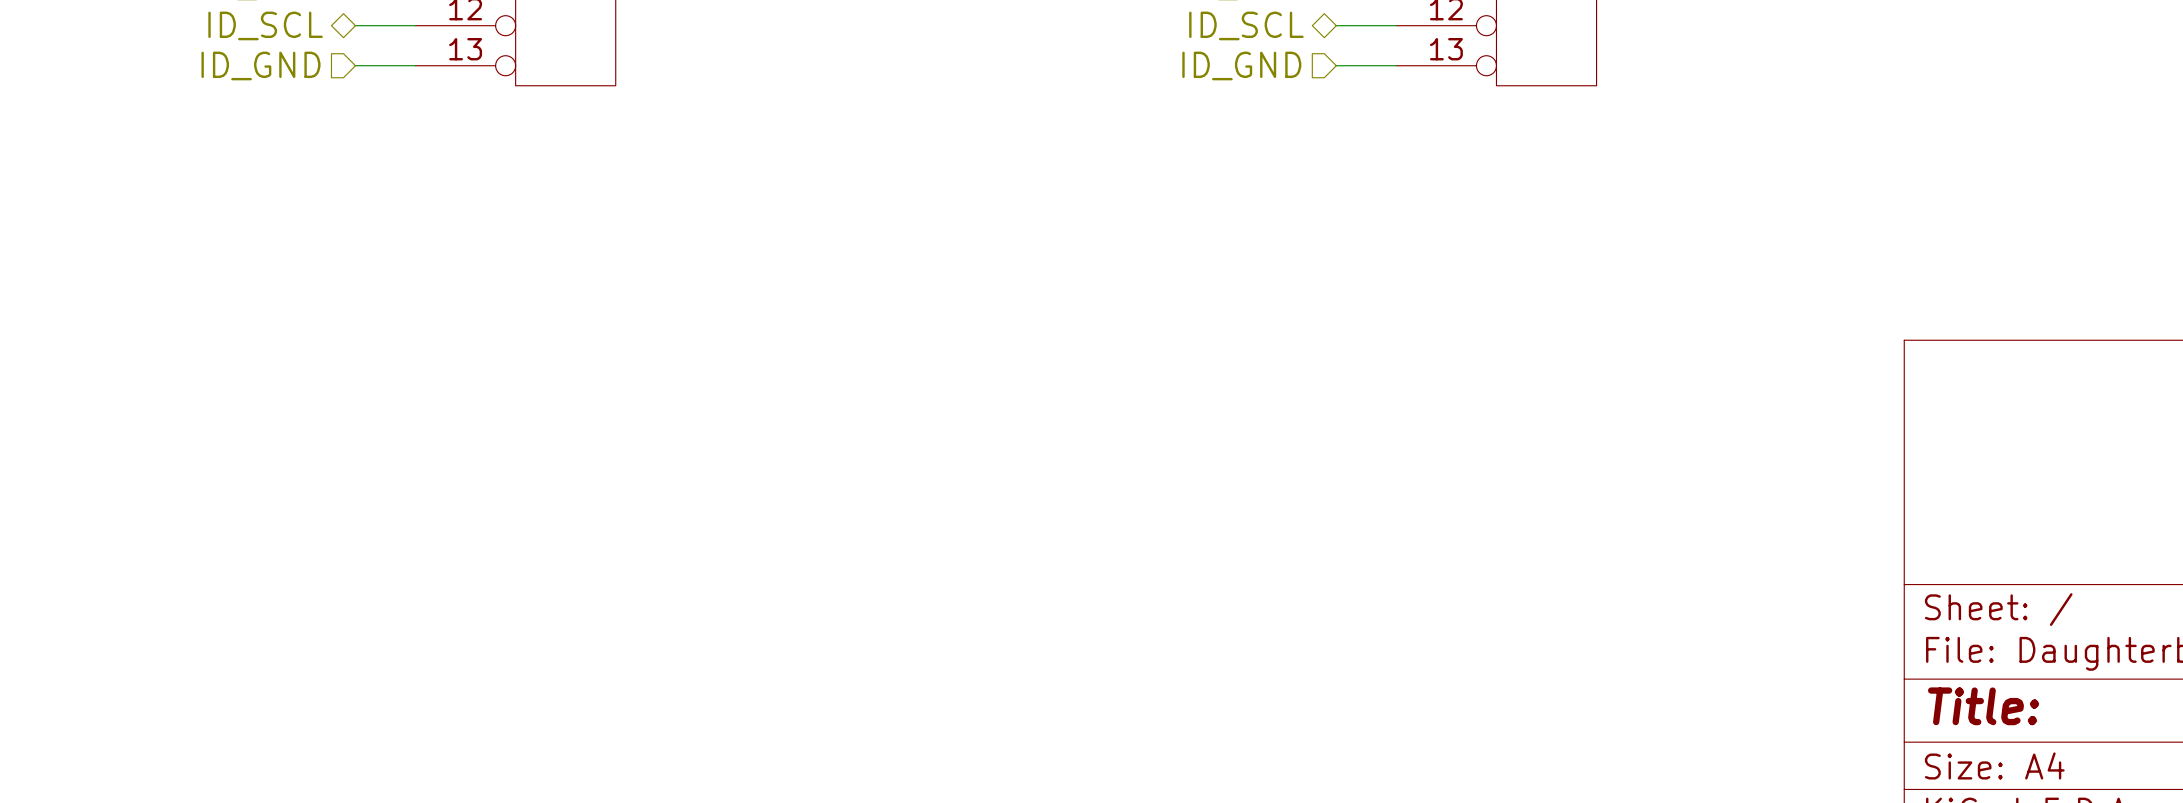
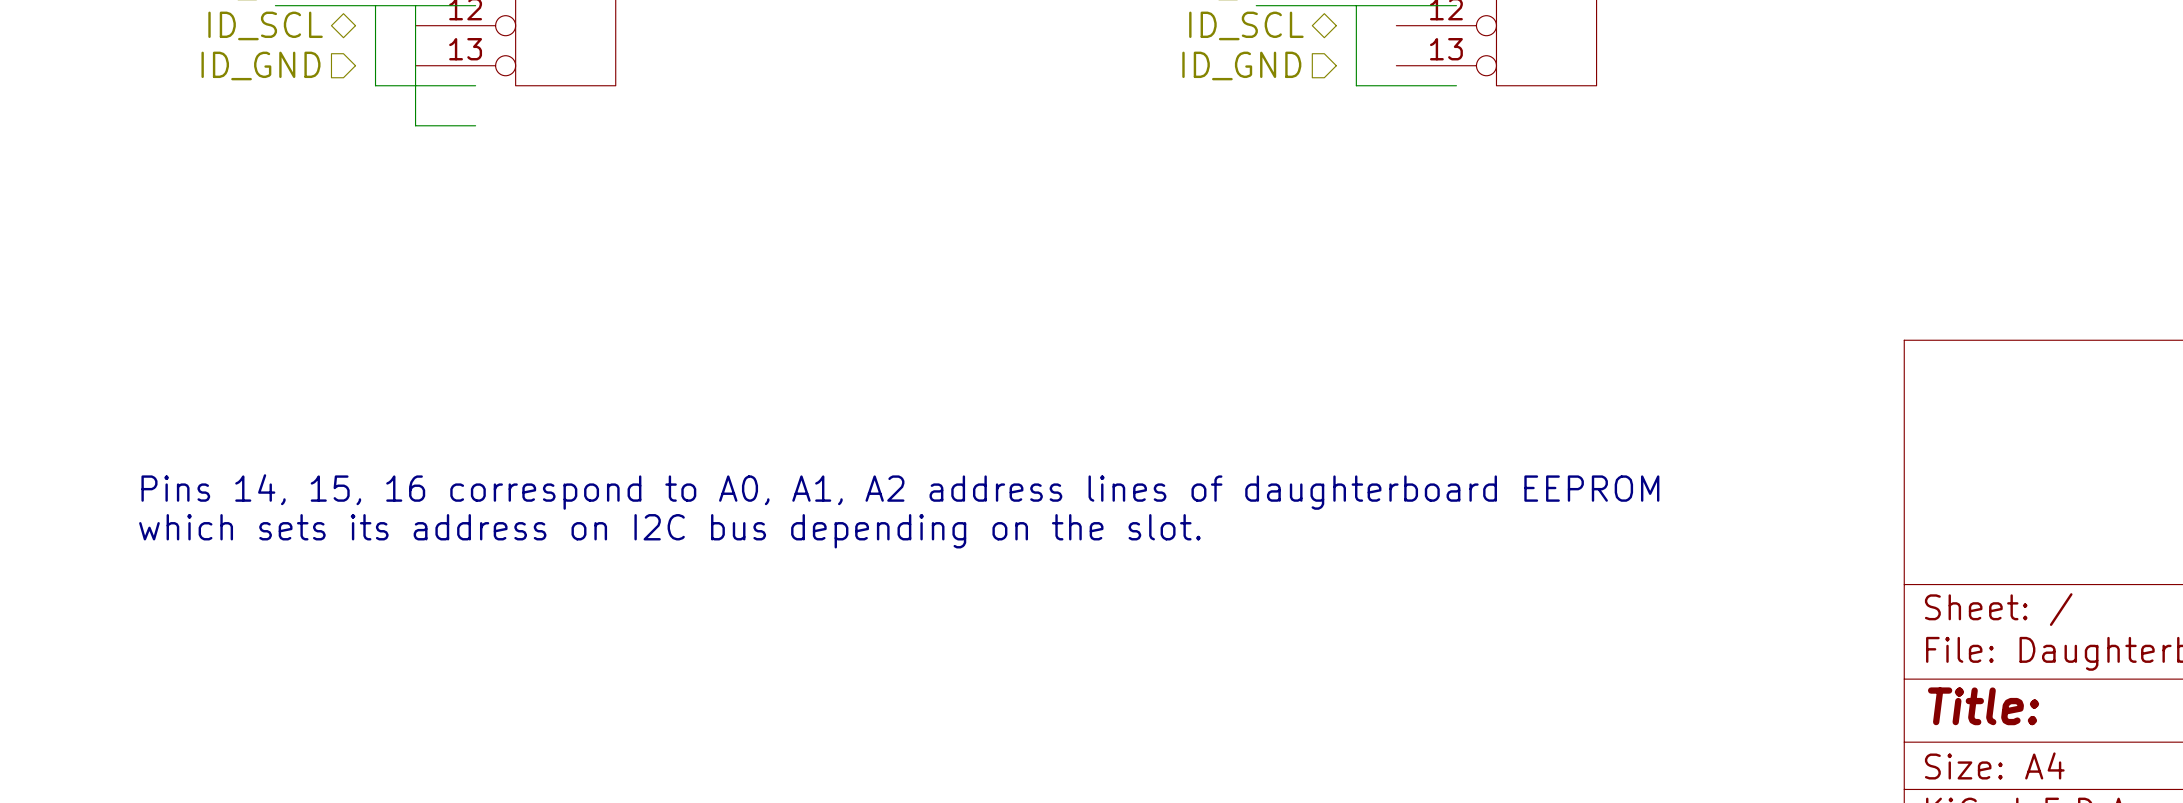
wire: none -> (275, 5) (475, 5)
wire: none -> (375, 5) (375, 85) (475, 85)
wire: none -> (415, 5) (415, 125) (475, 125)
wire: none -> (1256, 5) (1456, 5)
wire: none -> (1356, 5) (1356, 85) (1456, 85)
wire: (355, 25) (415, 25) -> none
wire: (1336, 25) (1396, 25) -> none
wire: (355, 65) (415, 65) -> none
wire: (1336, 65) (1396, 65) -> none
text: none -> Pins 14, 15, 16 correspond to A0, A1, A2 address lines of daughterboard EEPROM (900, 492)
text: none -> which sets its address on I2C bus depending on the slot. (669, 531)

